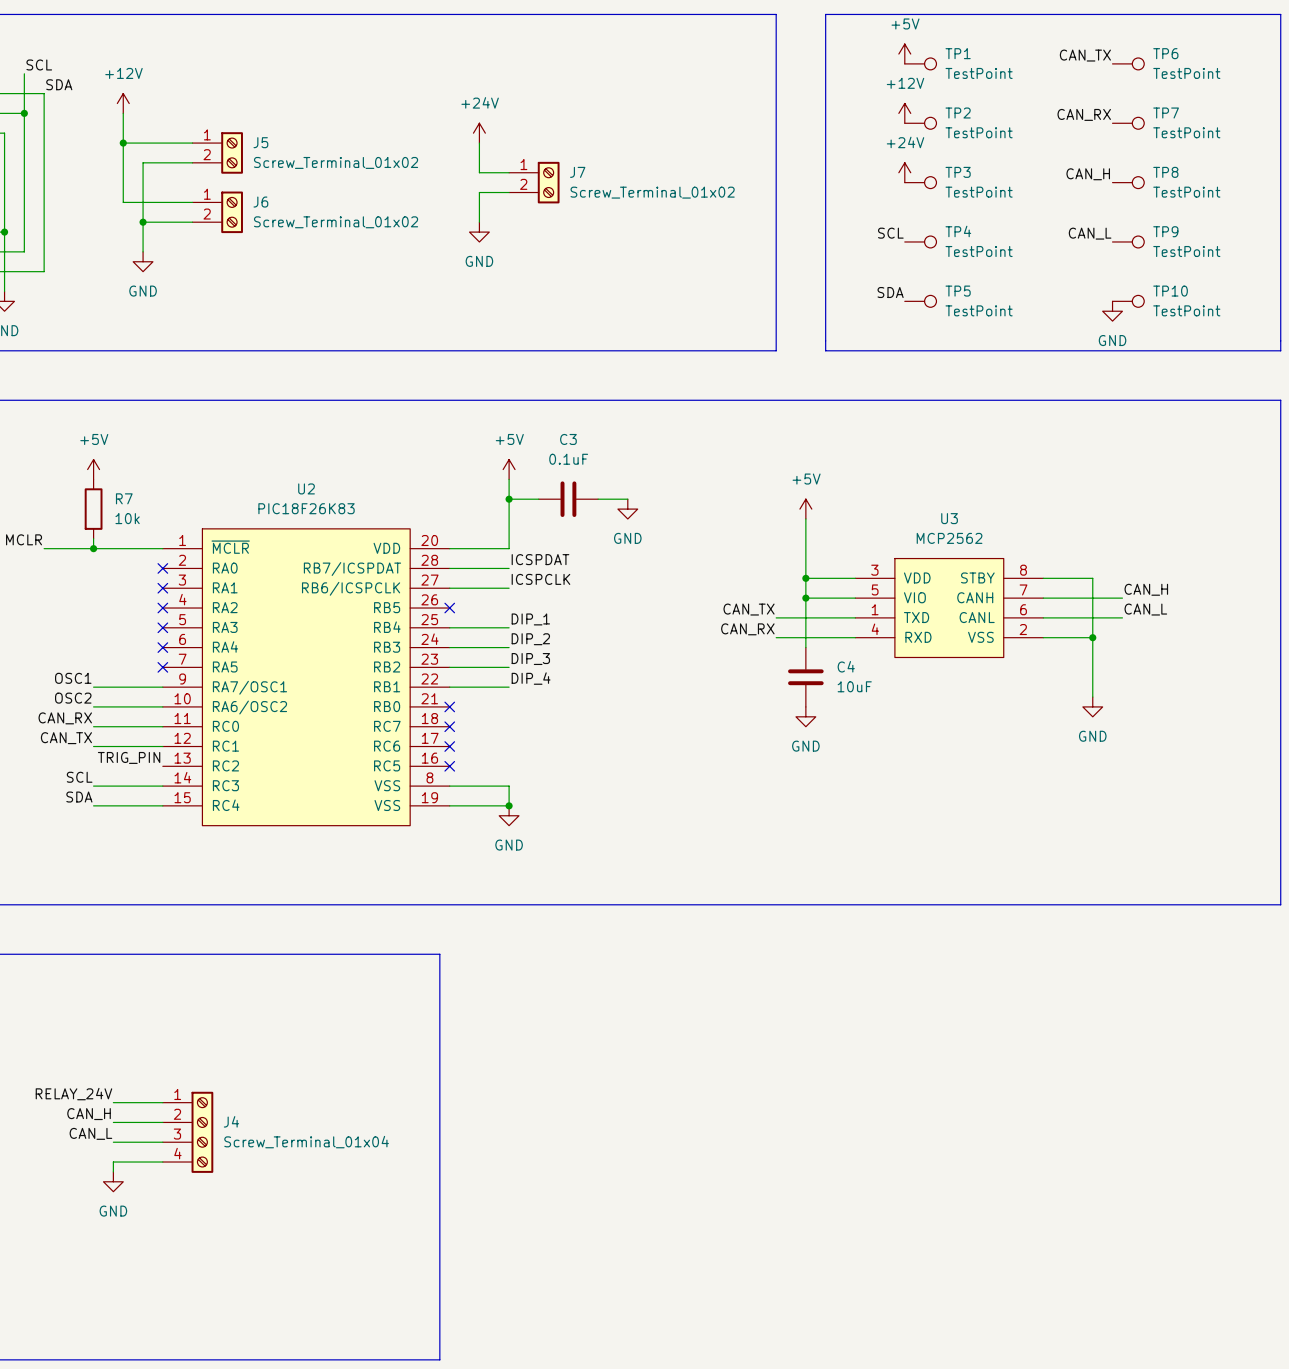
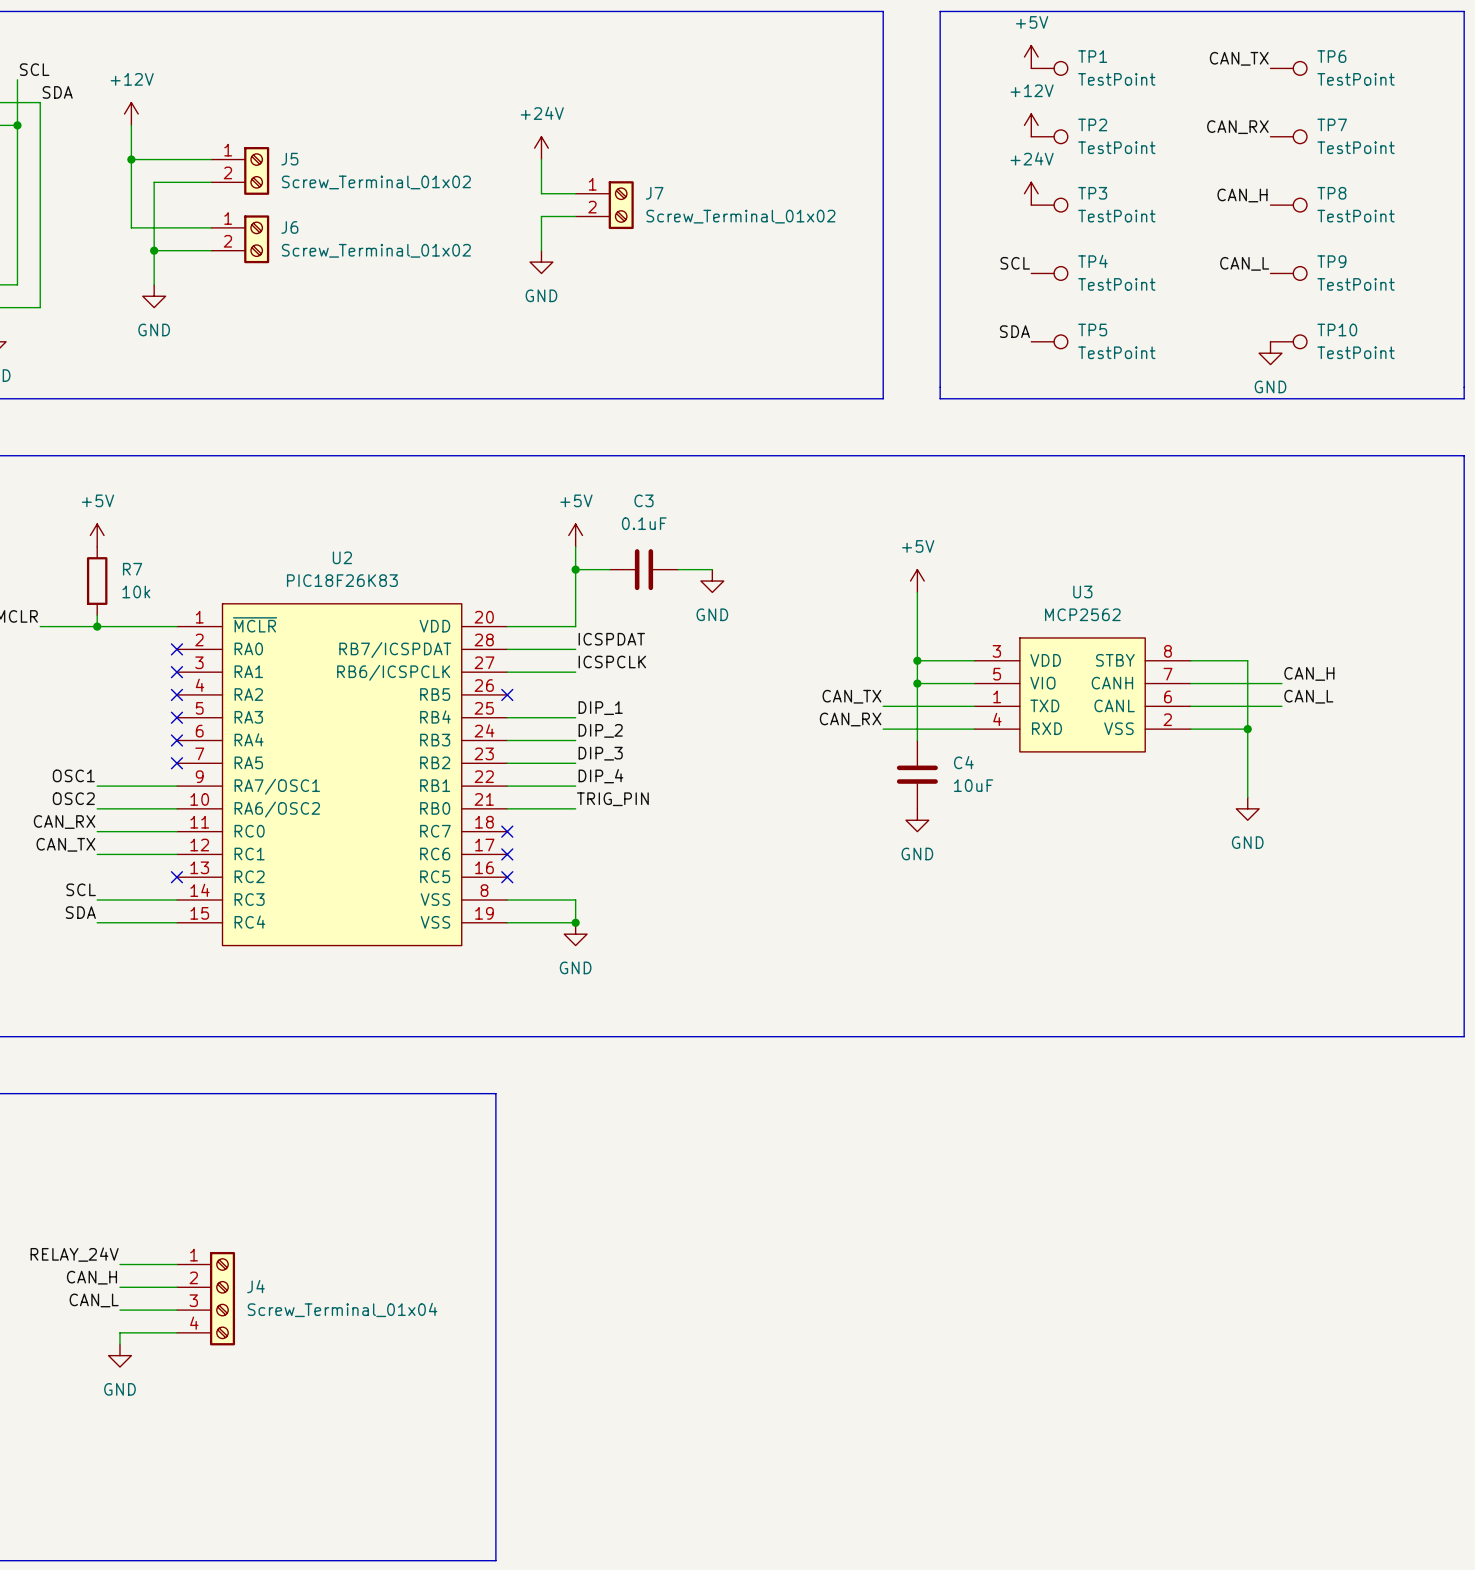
label: none -> TRIG_PIN (612, 799)
wire: none -> (507, 808) (575, 808)
no-connect mark: (449, 706) -> none
label: TRIG_PIN (129, 757) -> none
no-connect mark: none -> (176, 877)

